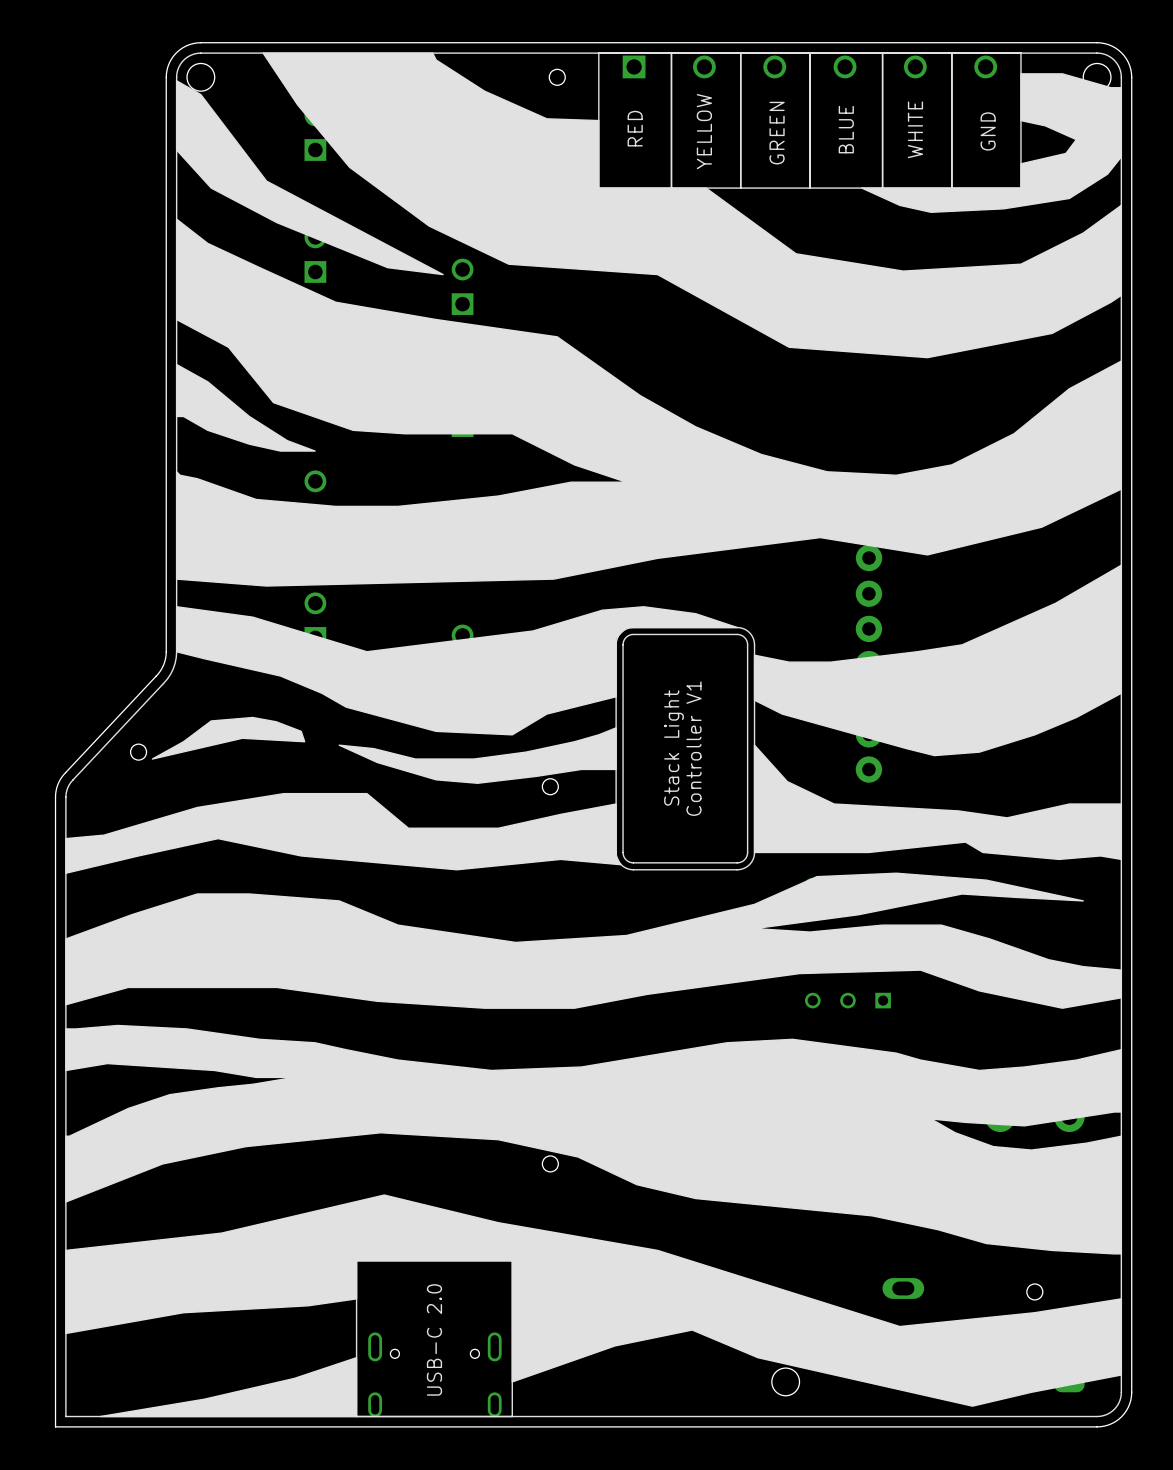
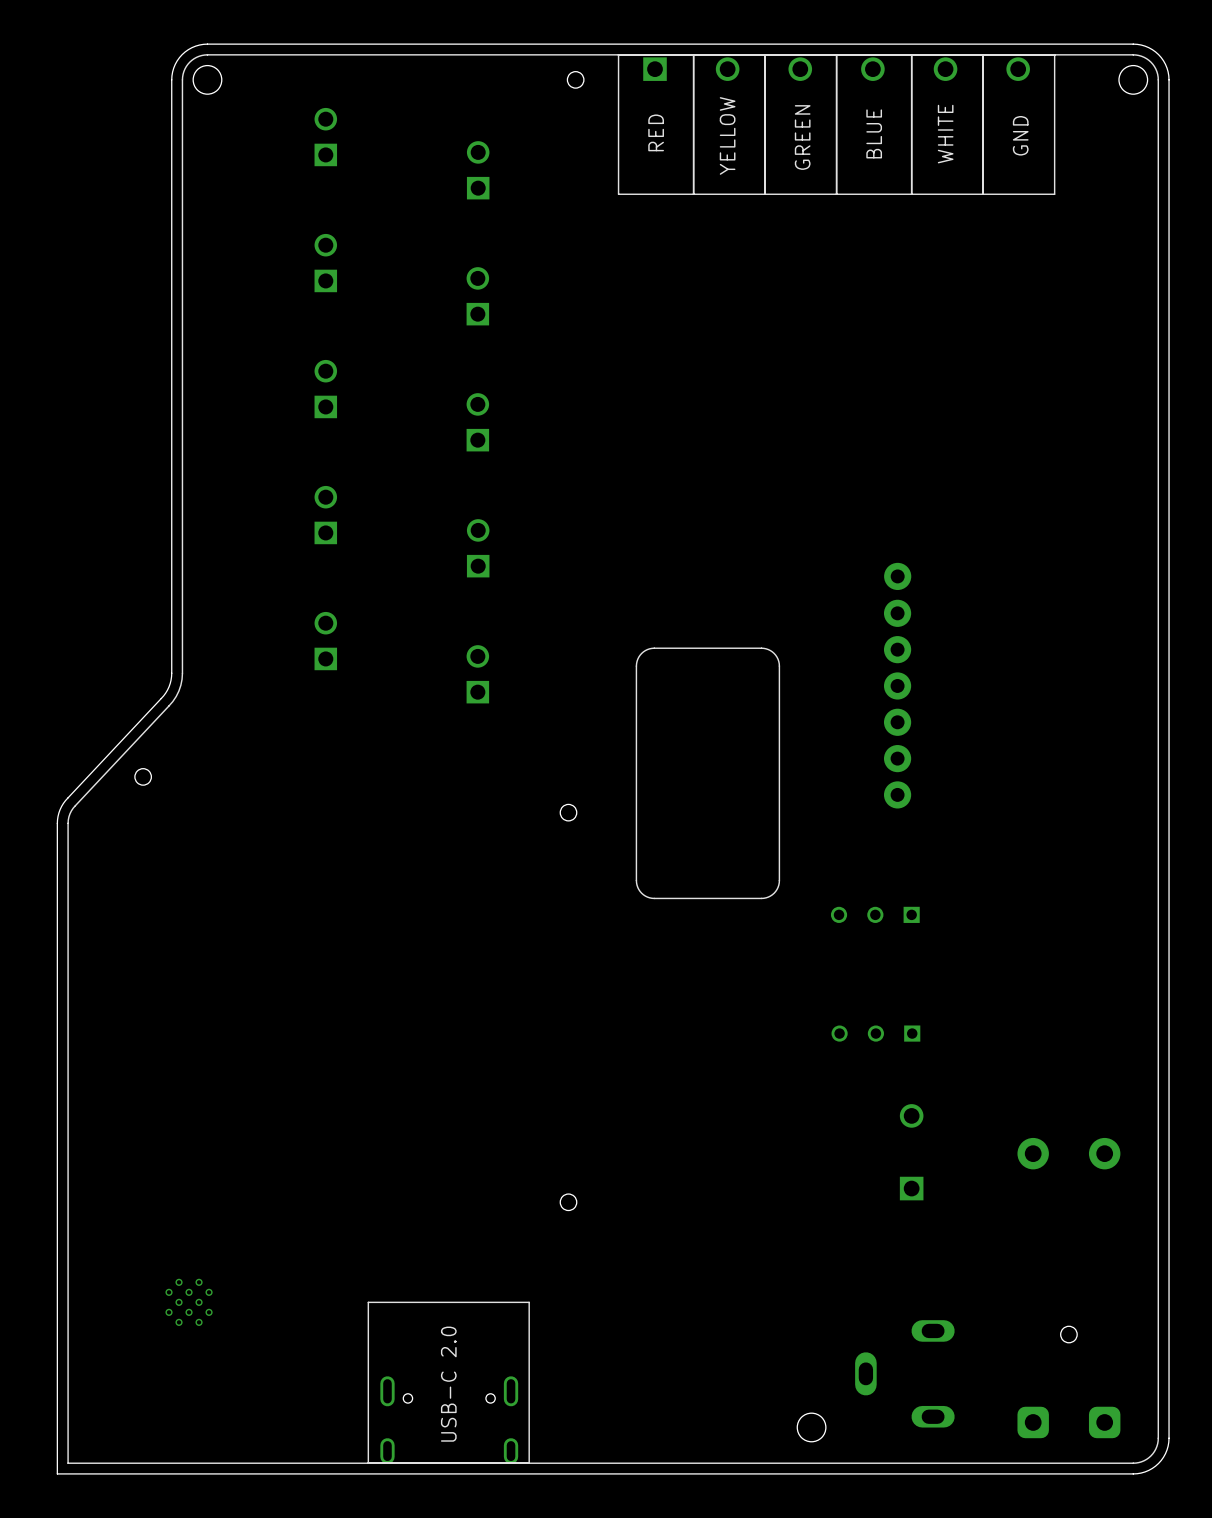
drawing: [65, 52, 1123, 1418] -> none
line: (737, 634) (633, 634) (627, 636) (623, 640) (623, 852) (624, 857) (629, 862) (737, 862) (742, 861) (746, 856) (747, 644) (744, 637) (737, 634) -> none
text: Stack Light (674, 747) -> none
text: Controller V1 (694, 748) -> none

